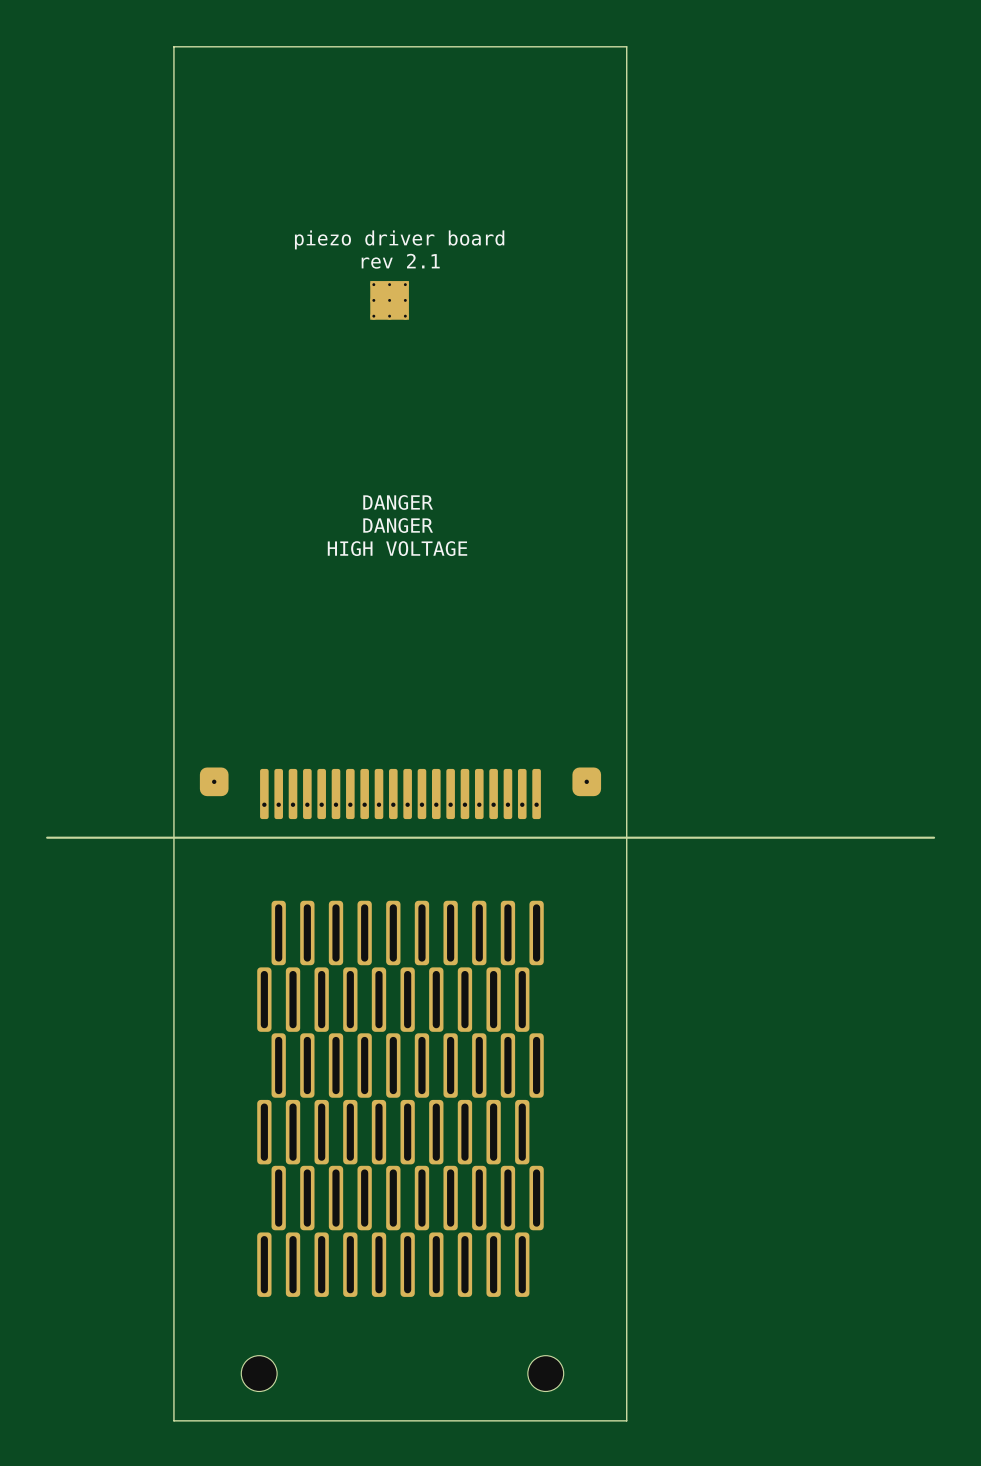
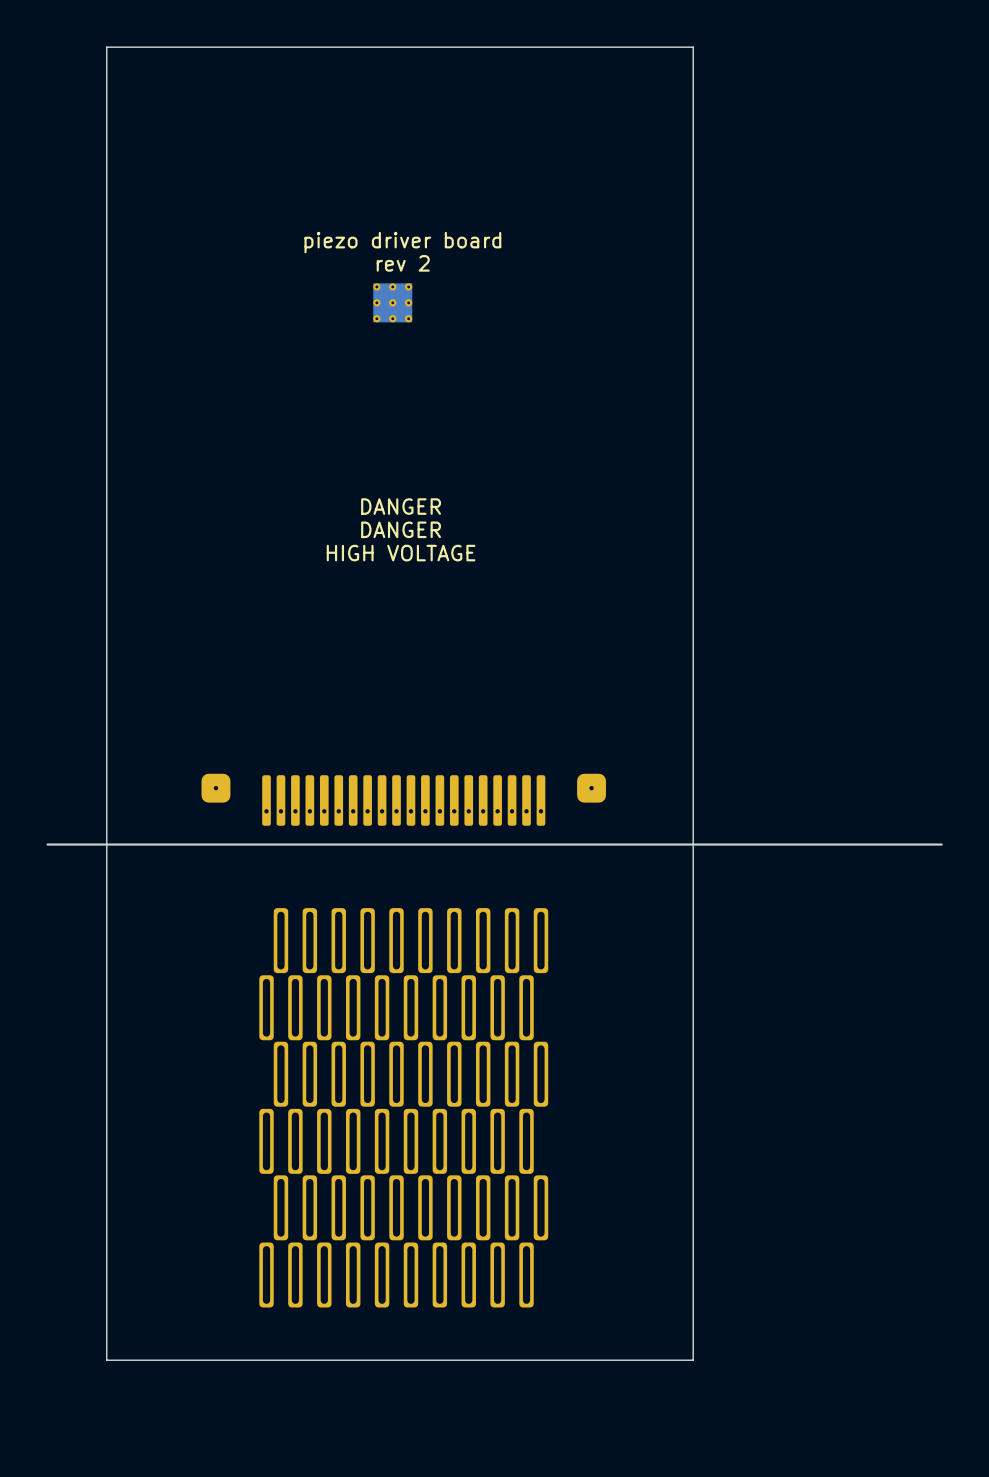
board edge: (626, 46) (626, 1420) (173, 1420) (173, 46) -> (631, 47) (693, 47) (693, 1360) (106, 1360) (106, 47) (175, 47)
text: rev 2.1 (400, 261) -> rev 2 (403, 263)
part: (259, 1373) -> none
part: (545, 1373) -> none

